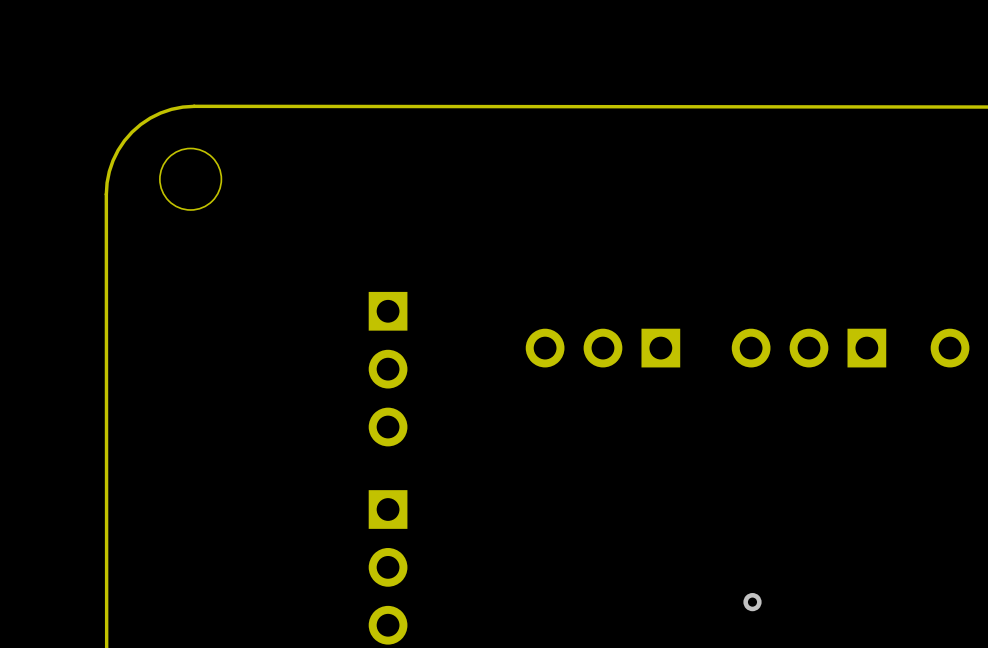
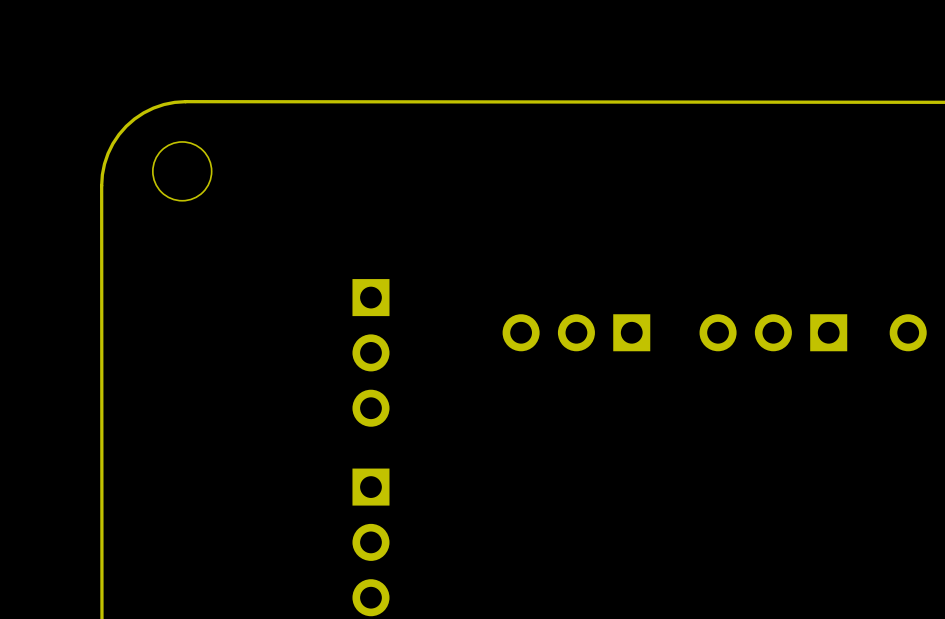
via: (752, 602) -> none

